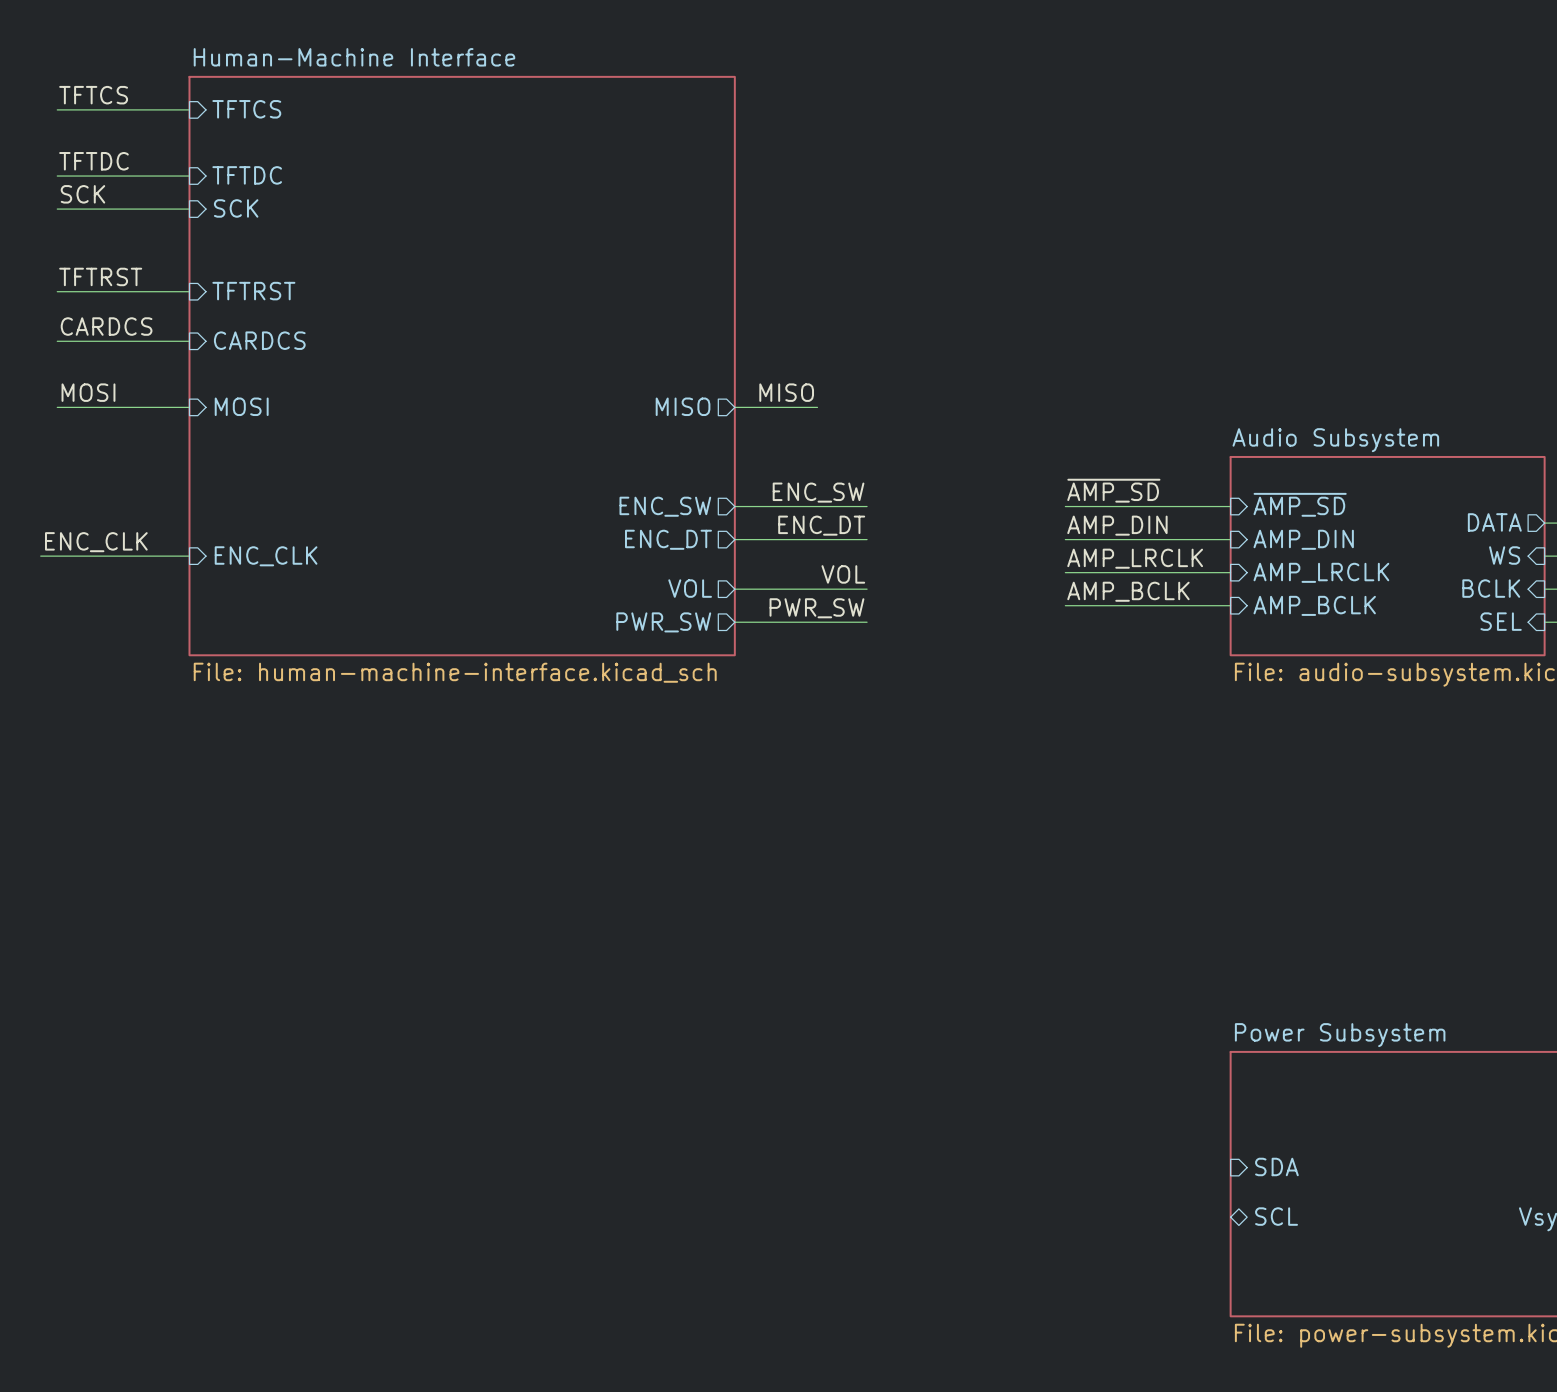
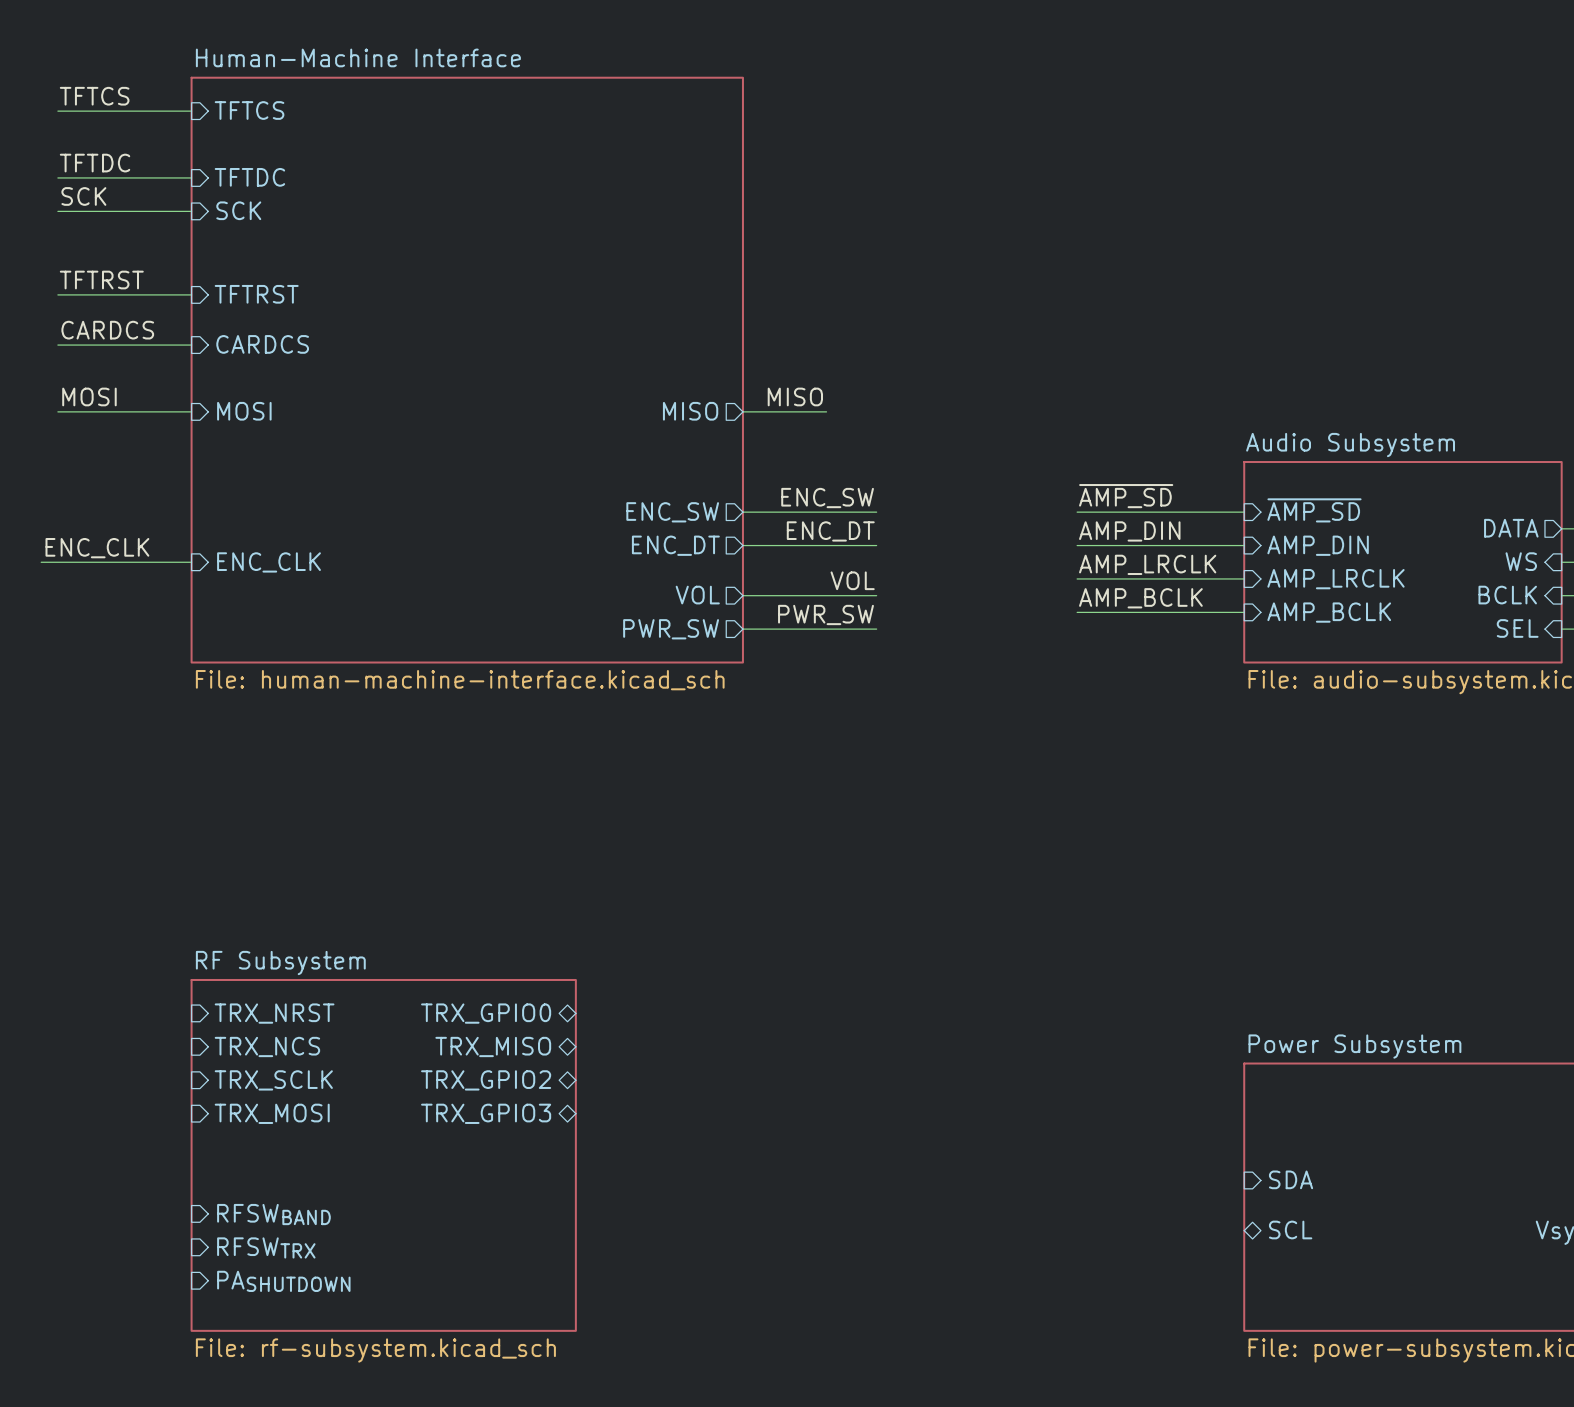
sheet pin: none -> TRX_NRST (274, 1013)
sheet pin: none -> TRX_GPIO0 (486, 1013)
sheet pin: none -> TRX_NCS (267, 1046)
sheet pin: none -> TRX_MISO (493, 1046)
sheet pin: none -> TRX_SCLK (273, 1080)
sheet pin: none -> TRX_GPIO2 (486, 1080)
sheet pin: none -> TRX_MOSI (272, 1113)
sheet pin: none -> TRX_GPIO3 (486, 1113)
sheet RF Subsystem: none -> File: rf-subsystem.kicad_sch (383, 1155)
sheet pin: none -> RFSWBAND (273, 1214)
sheet pin: none -> RFSWTRX (266, 1247)
sheet pin: none -> PASHUTDOWN (283, 1281)

